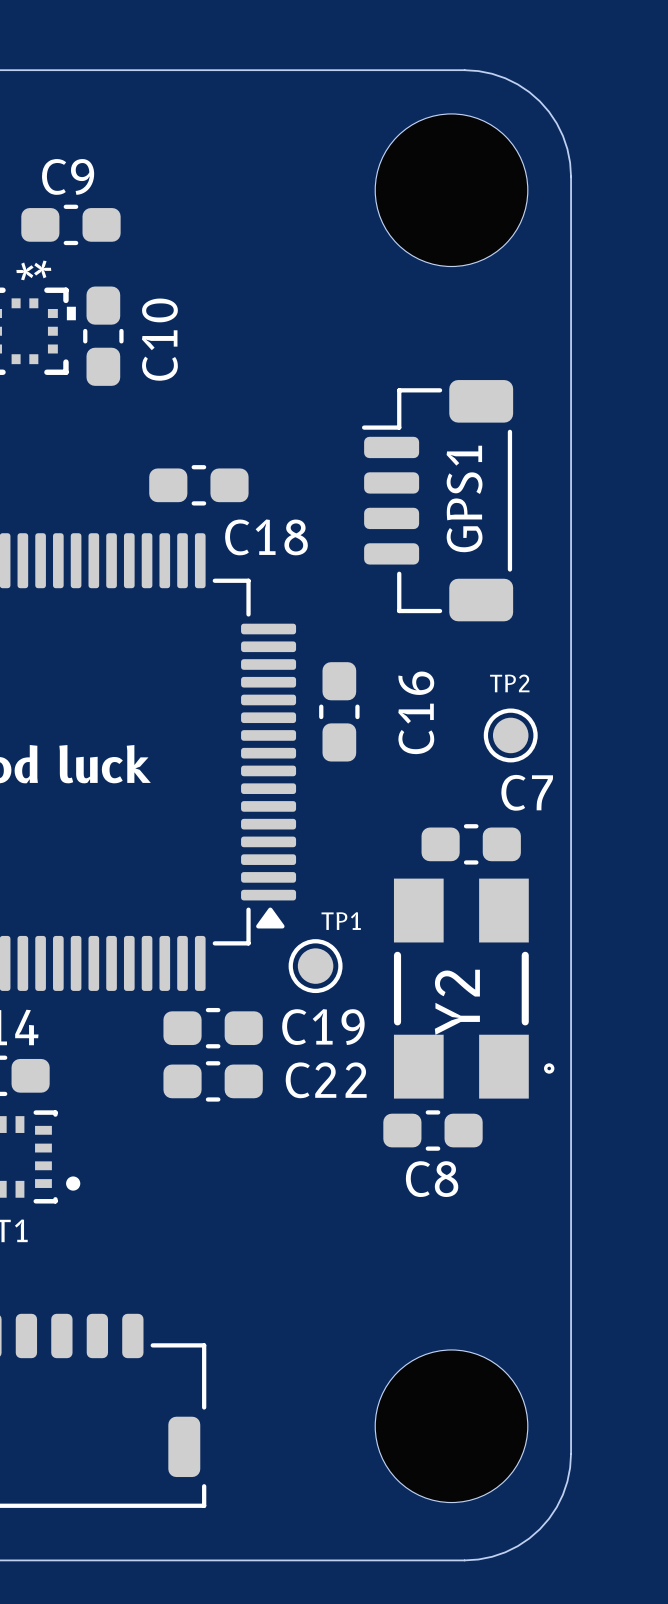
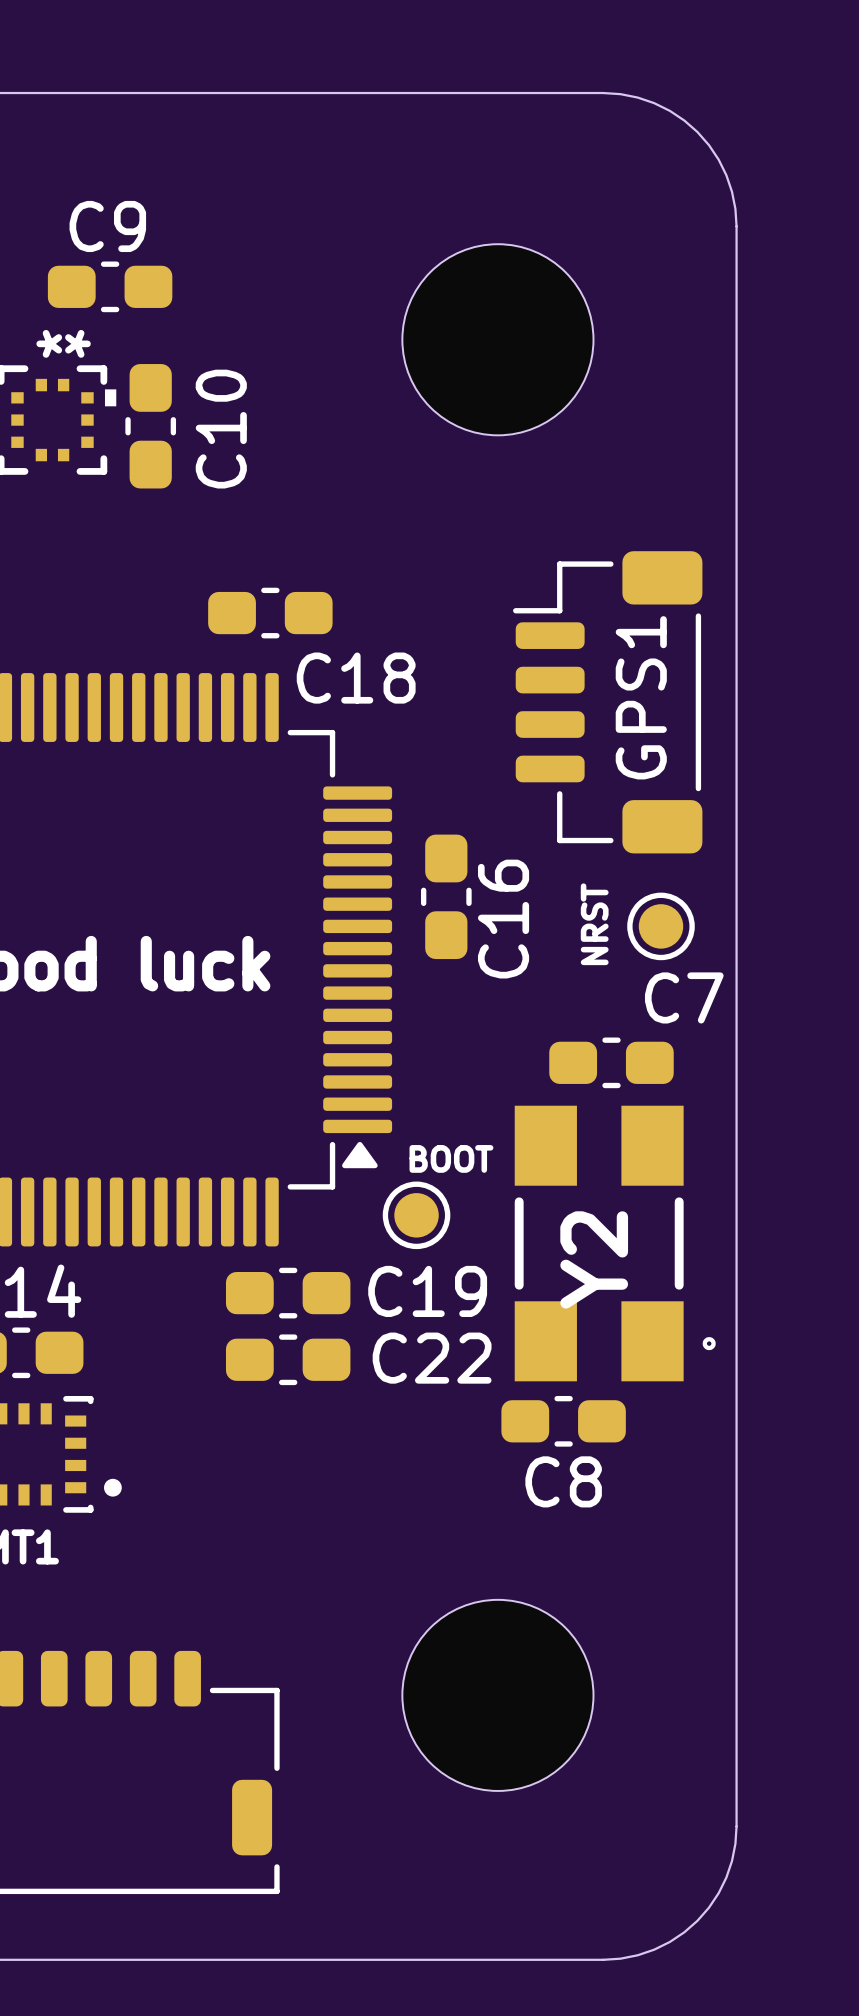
part position: (451, 190) -> (497, 339)
GPS1 position: (437, 500) -> (607, 702)
TP2 name: TP2 (509, 683) -> NRST (594, 924)
C16 name position: C16 (416, 712) -> C16 (503, 919)
TP1 name: TP1 (341, 921) -> BOOT (451, 1158)
part position: (451, 1426) -> (497, 1695)

